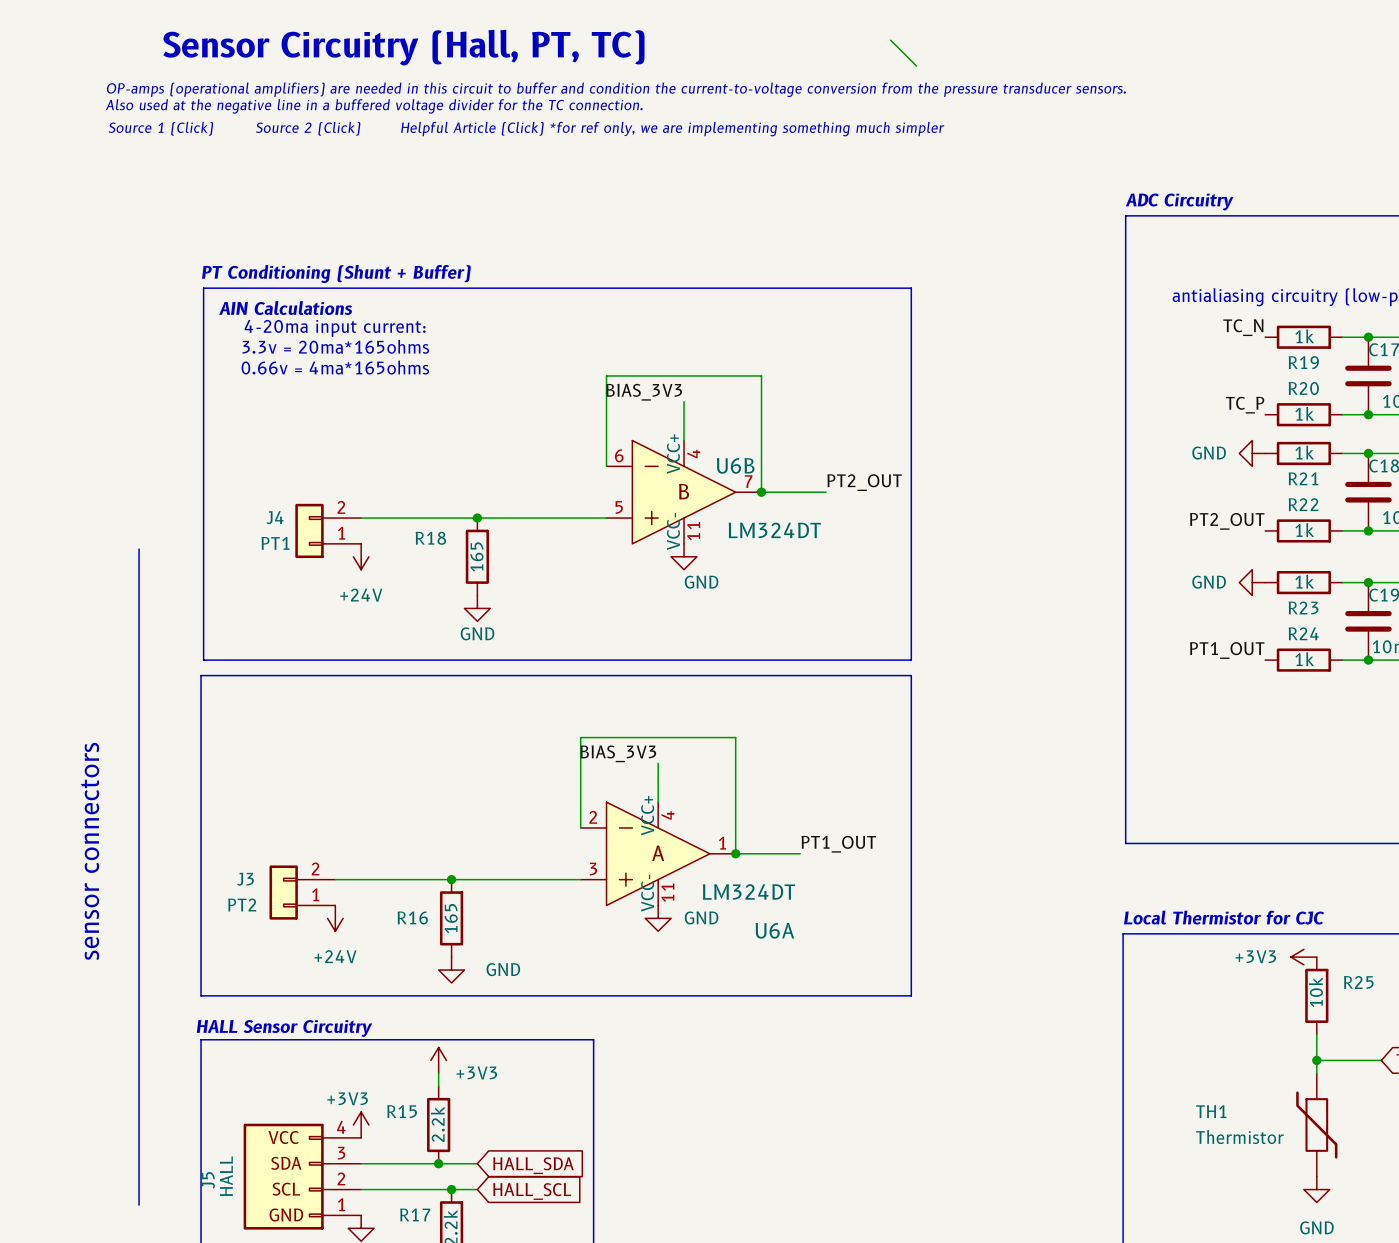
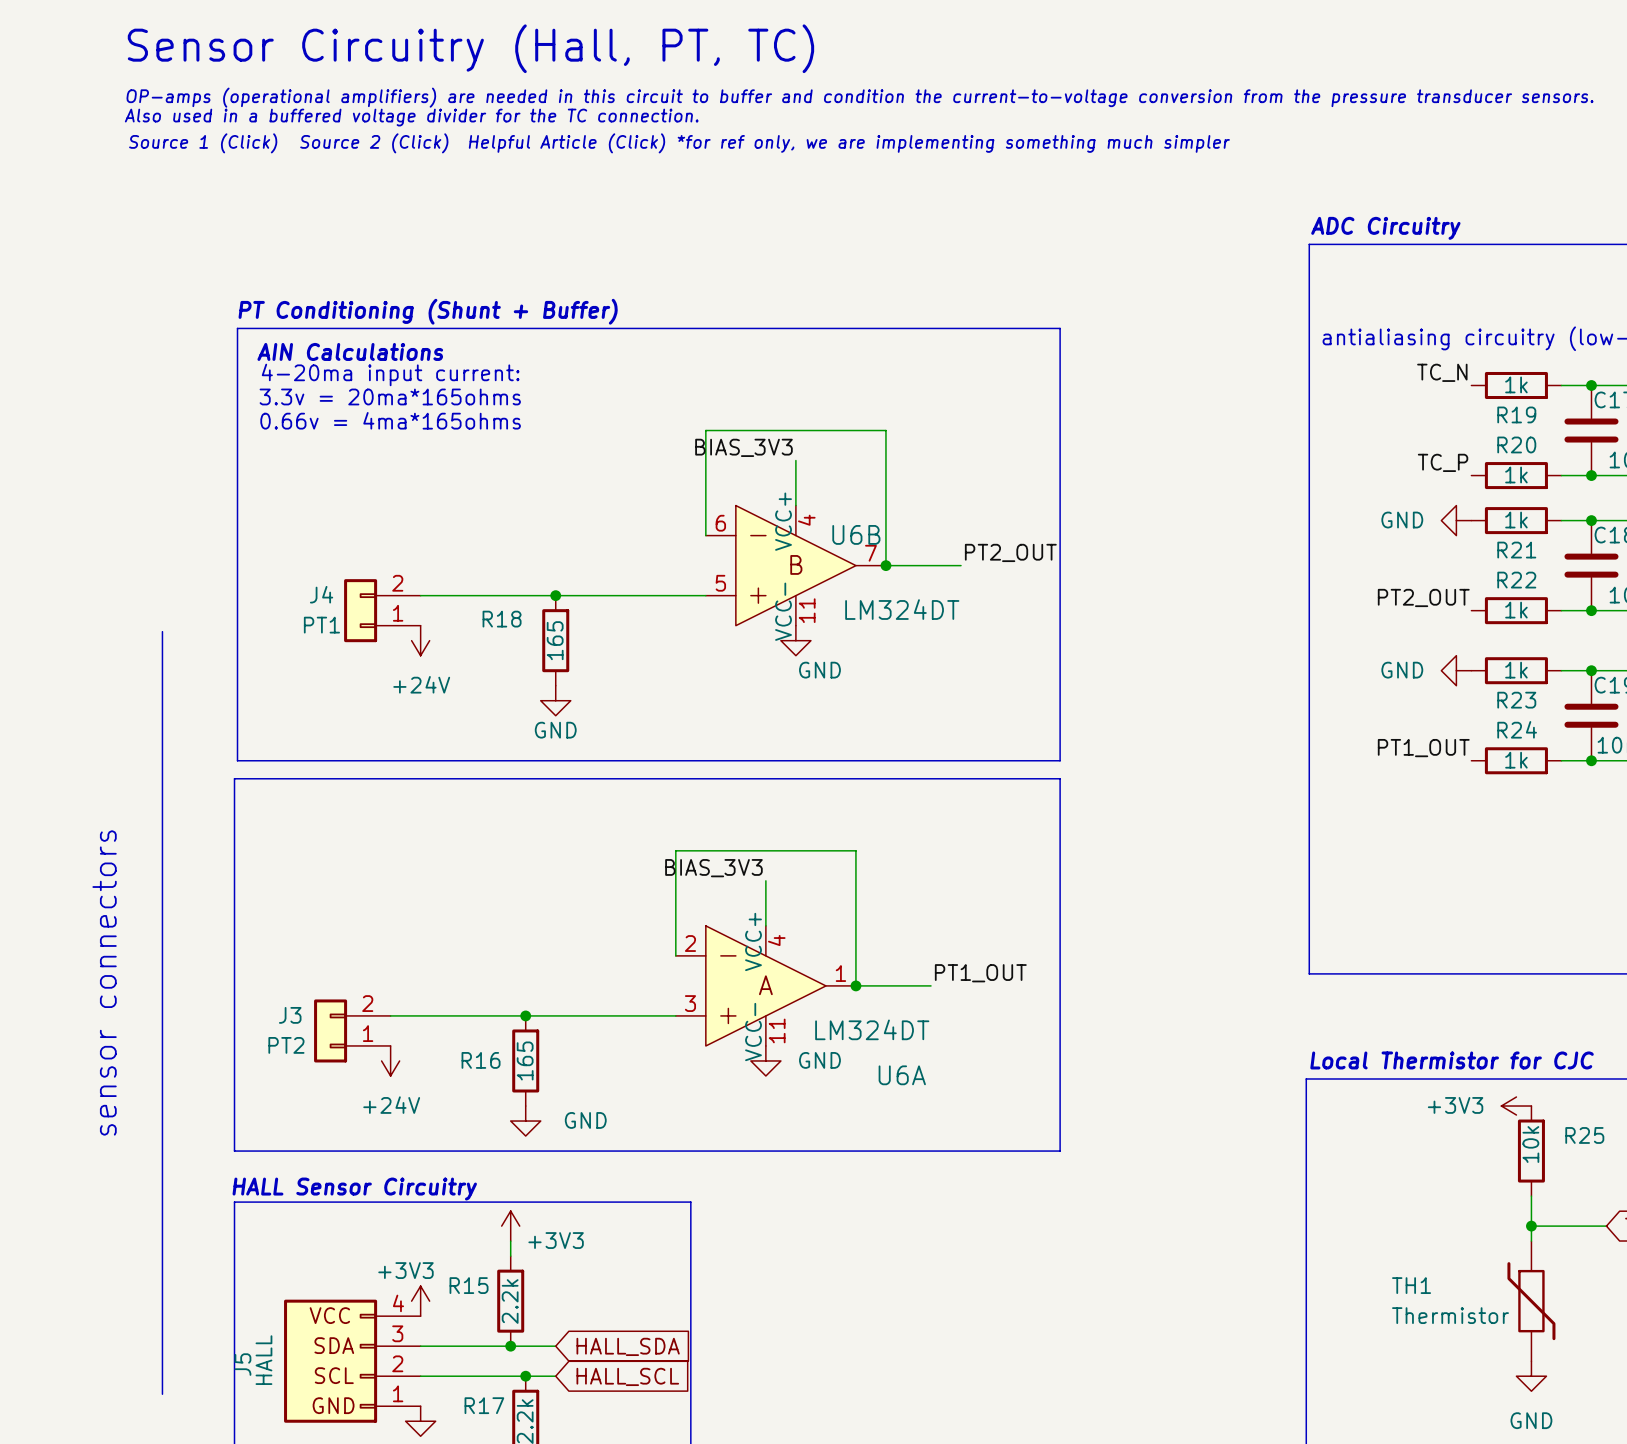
wire: (890, 40) (916, 66) -> none
text: Also used at the negative line in a buffered voltage divider for the TC connection. (374, 106) -> Also used in a buffered voltage divider for the TC connection. (411, 117)

